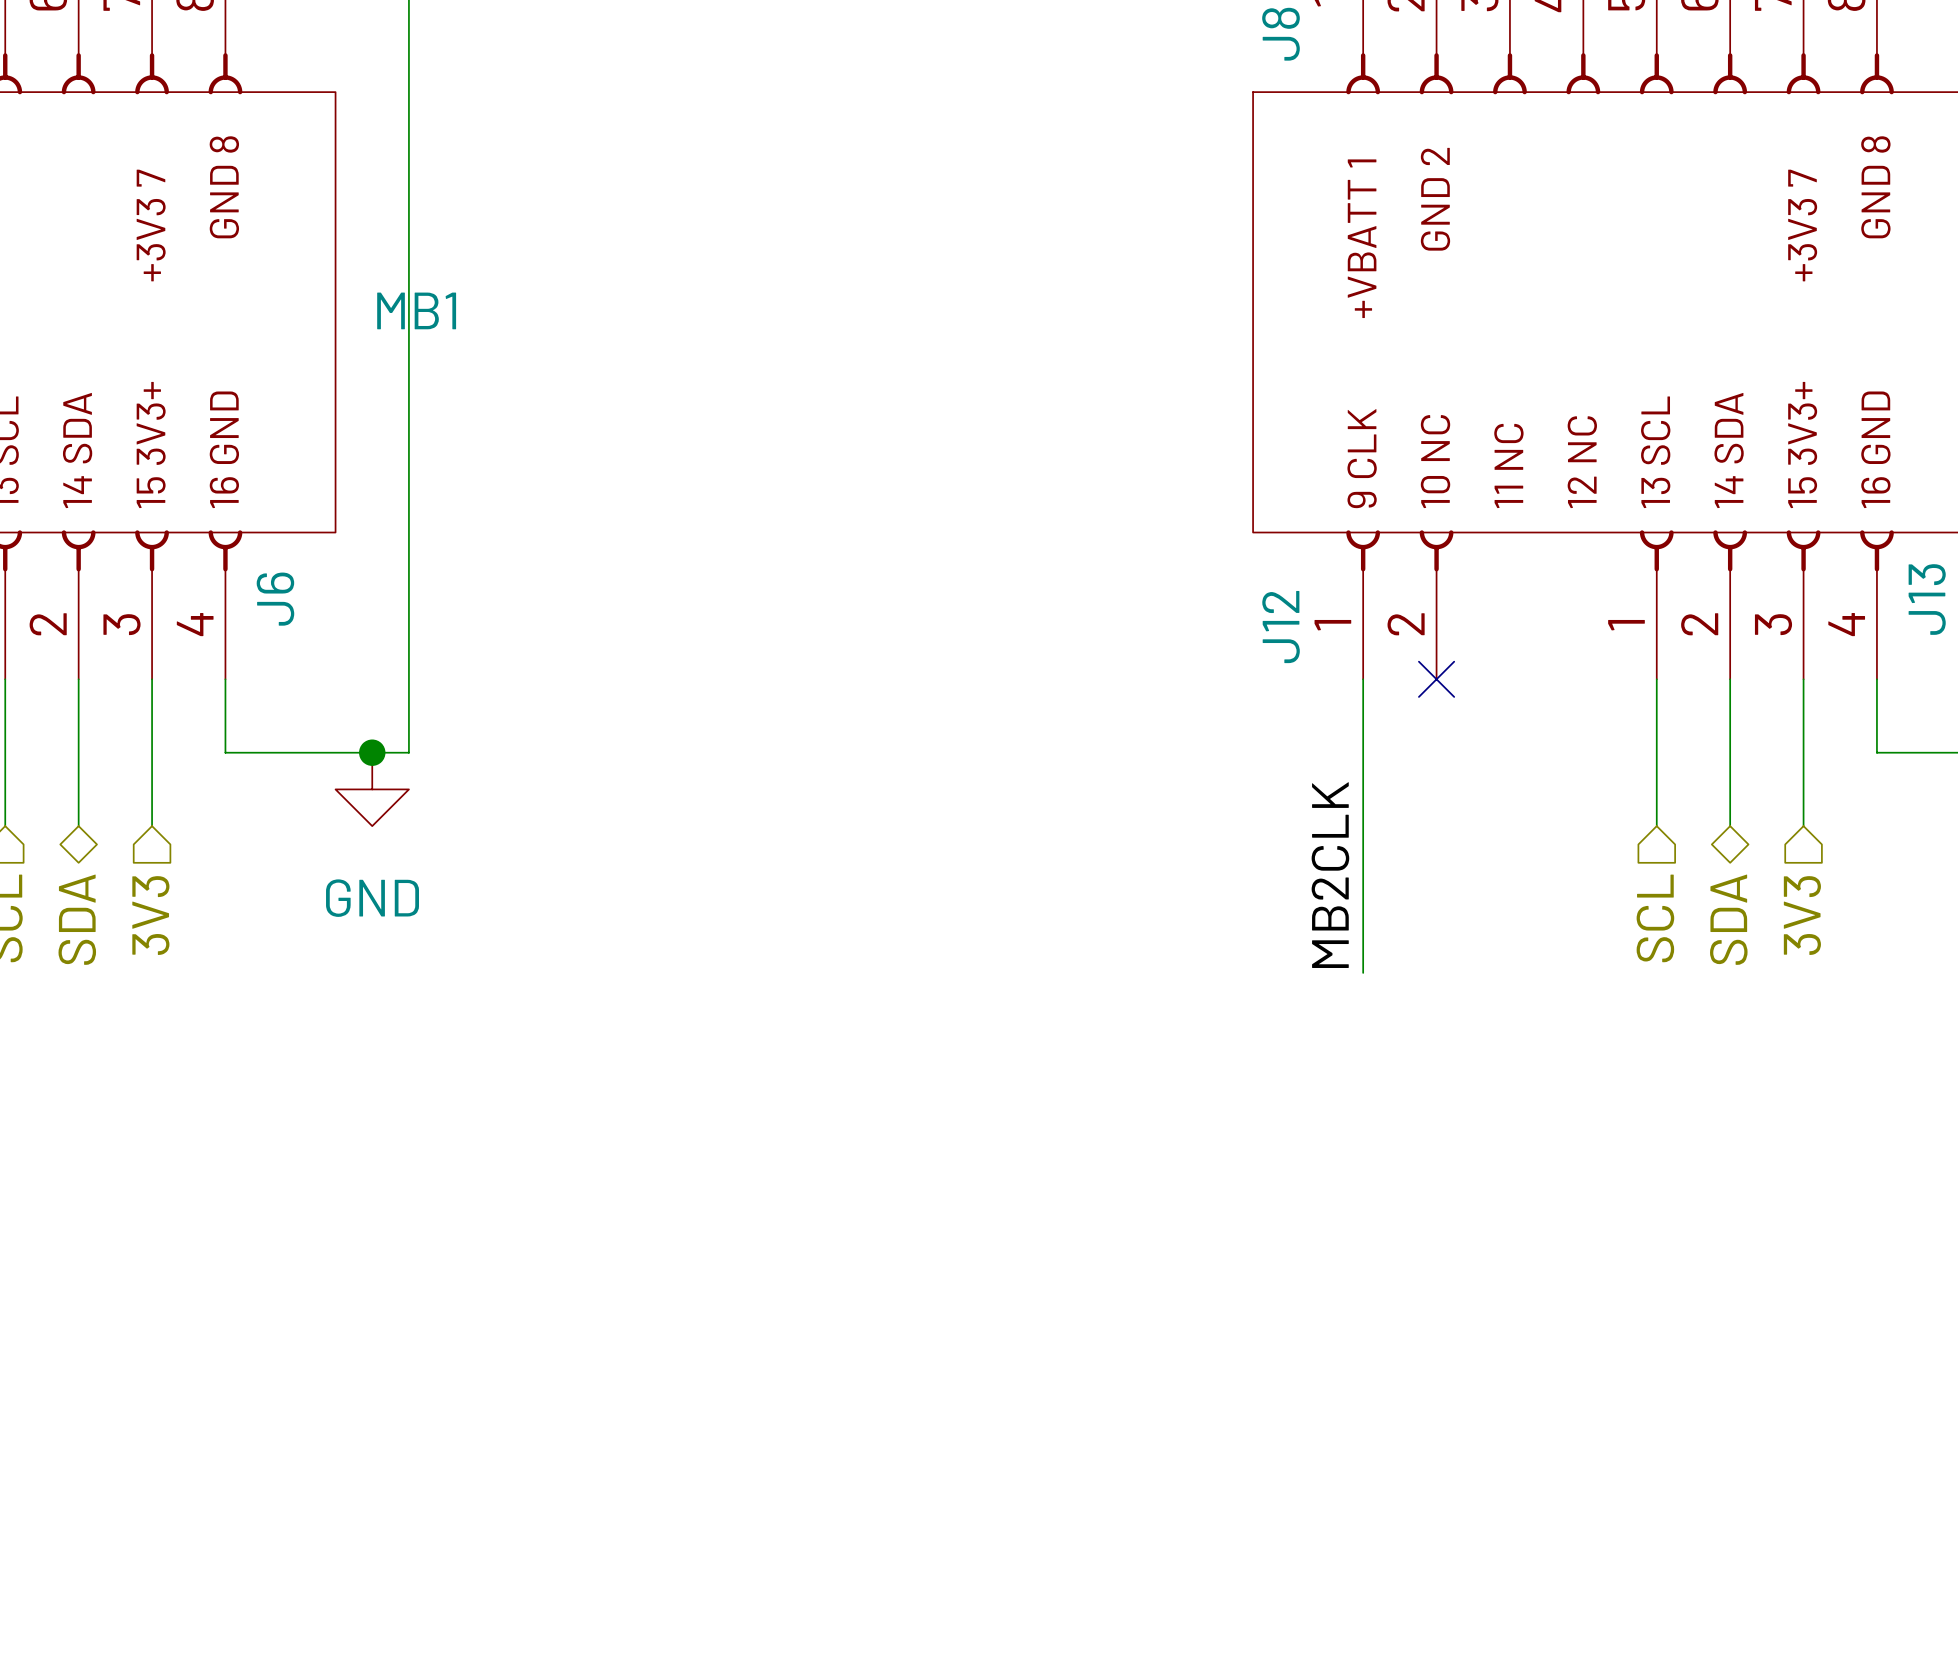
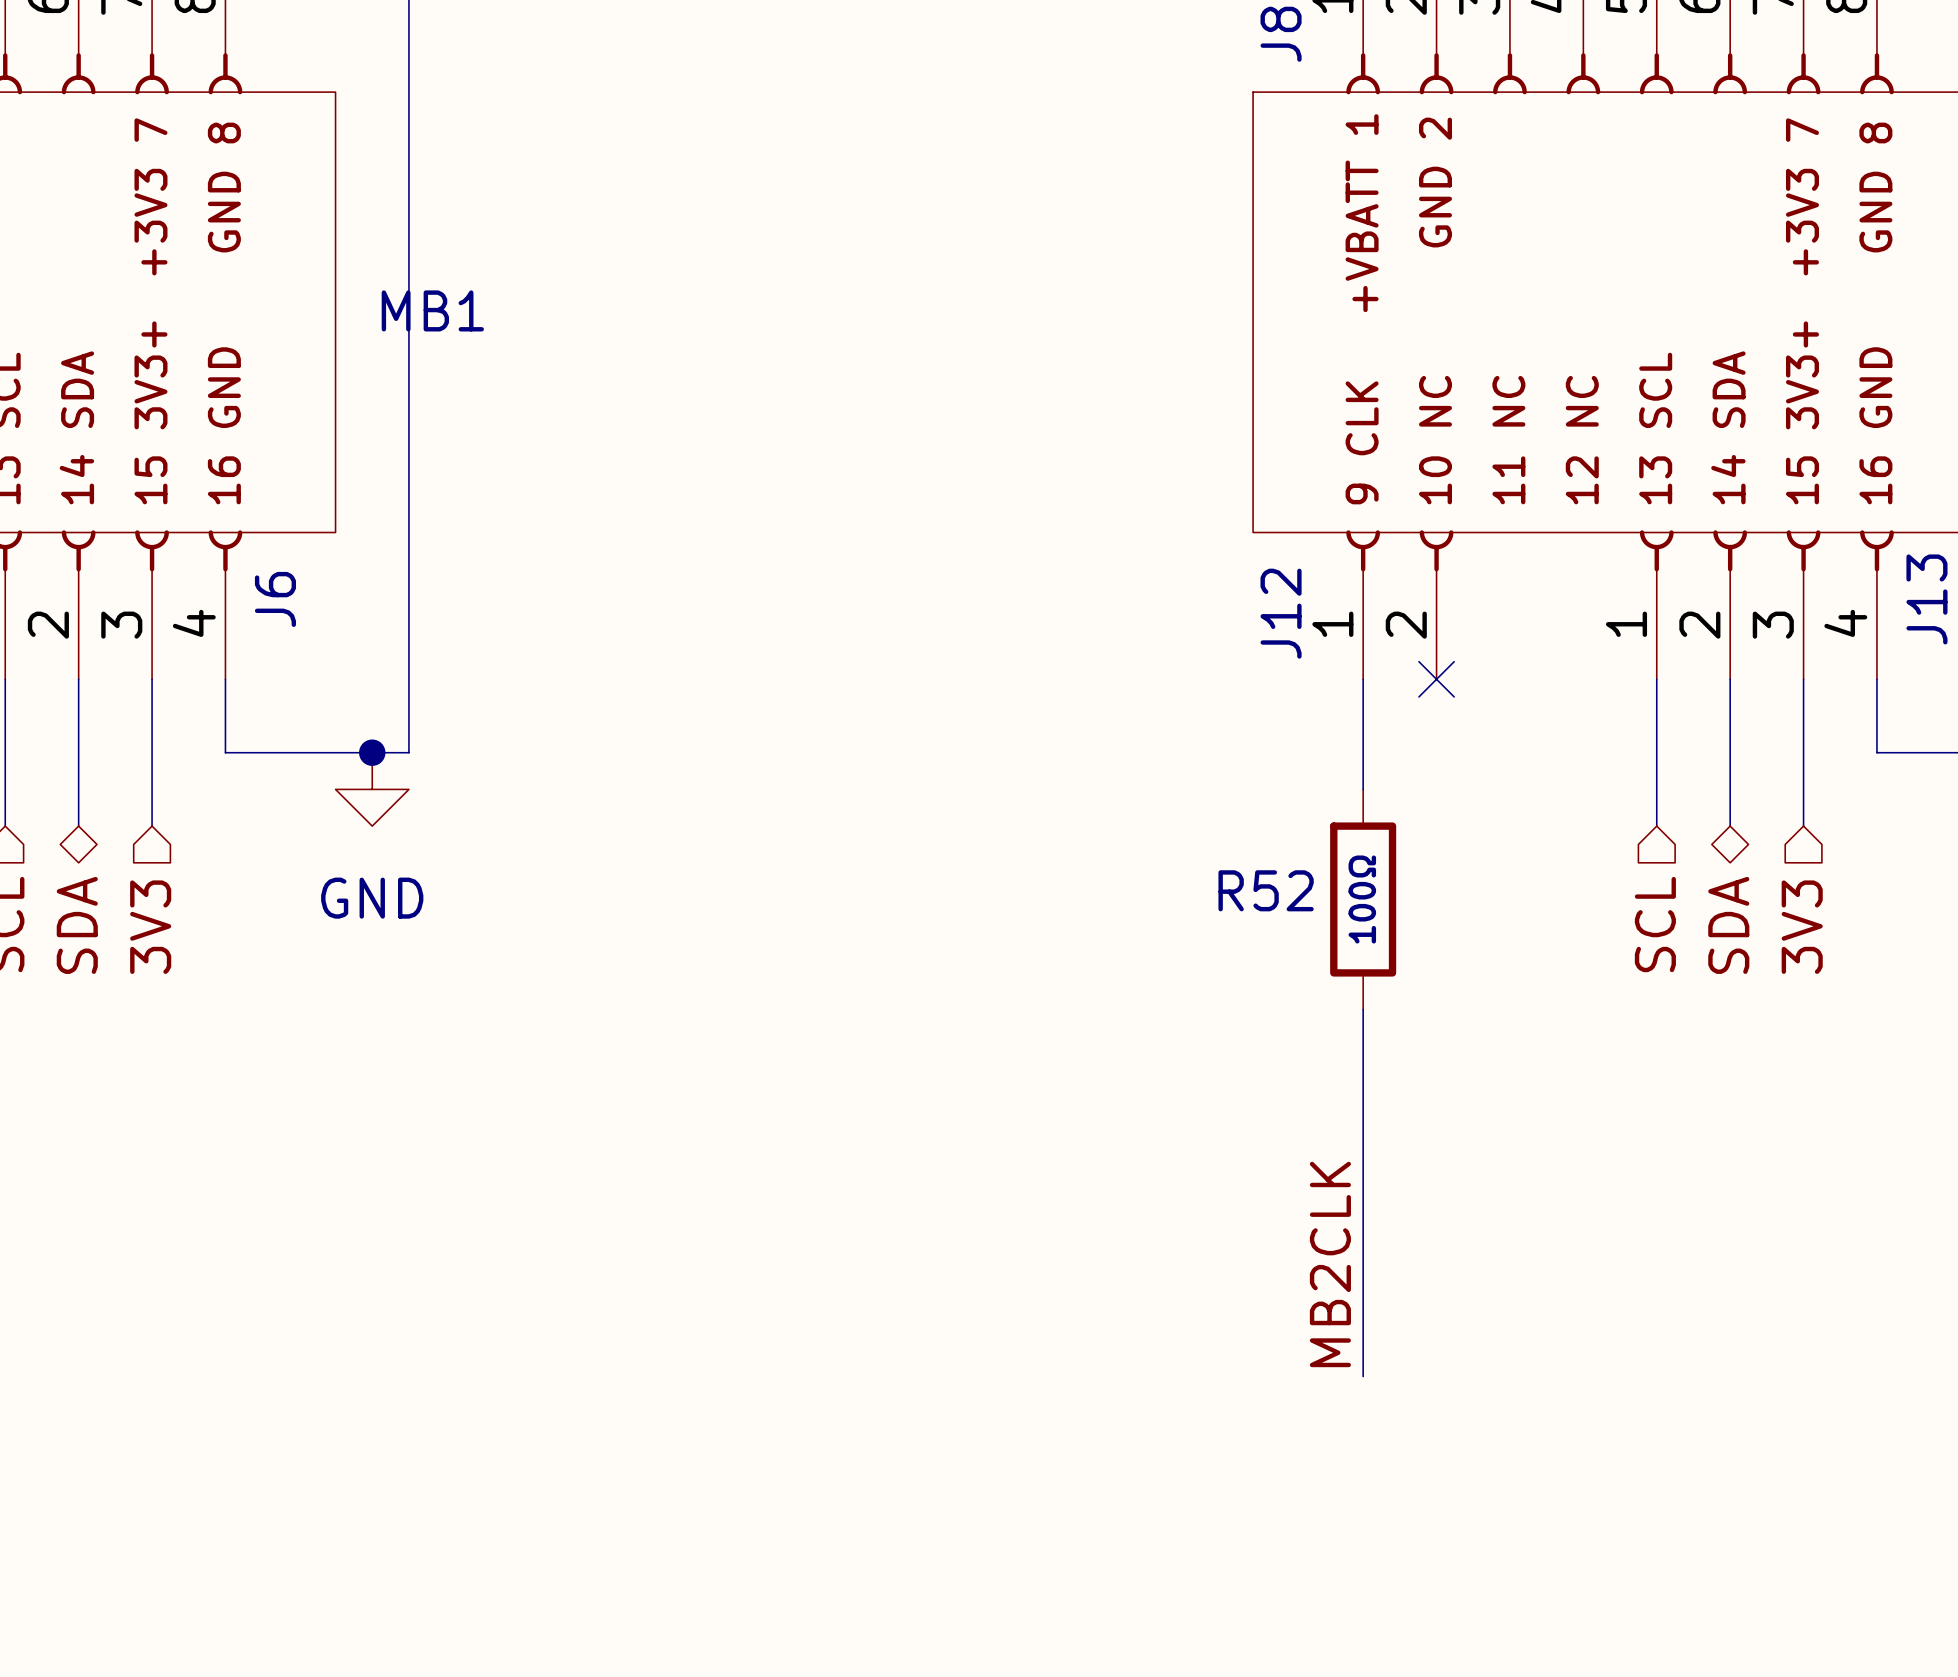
wire: (1363, 789) (1363, 972) -> none
label position: MB2CLK (1330, 875) -> MB2CLK (1330, 1264)
R52: none -> 100Ω (1363, 899)
wire: none -> (1363, 1009) (1363, 1376)

